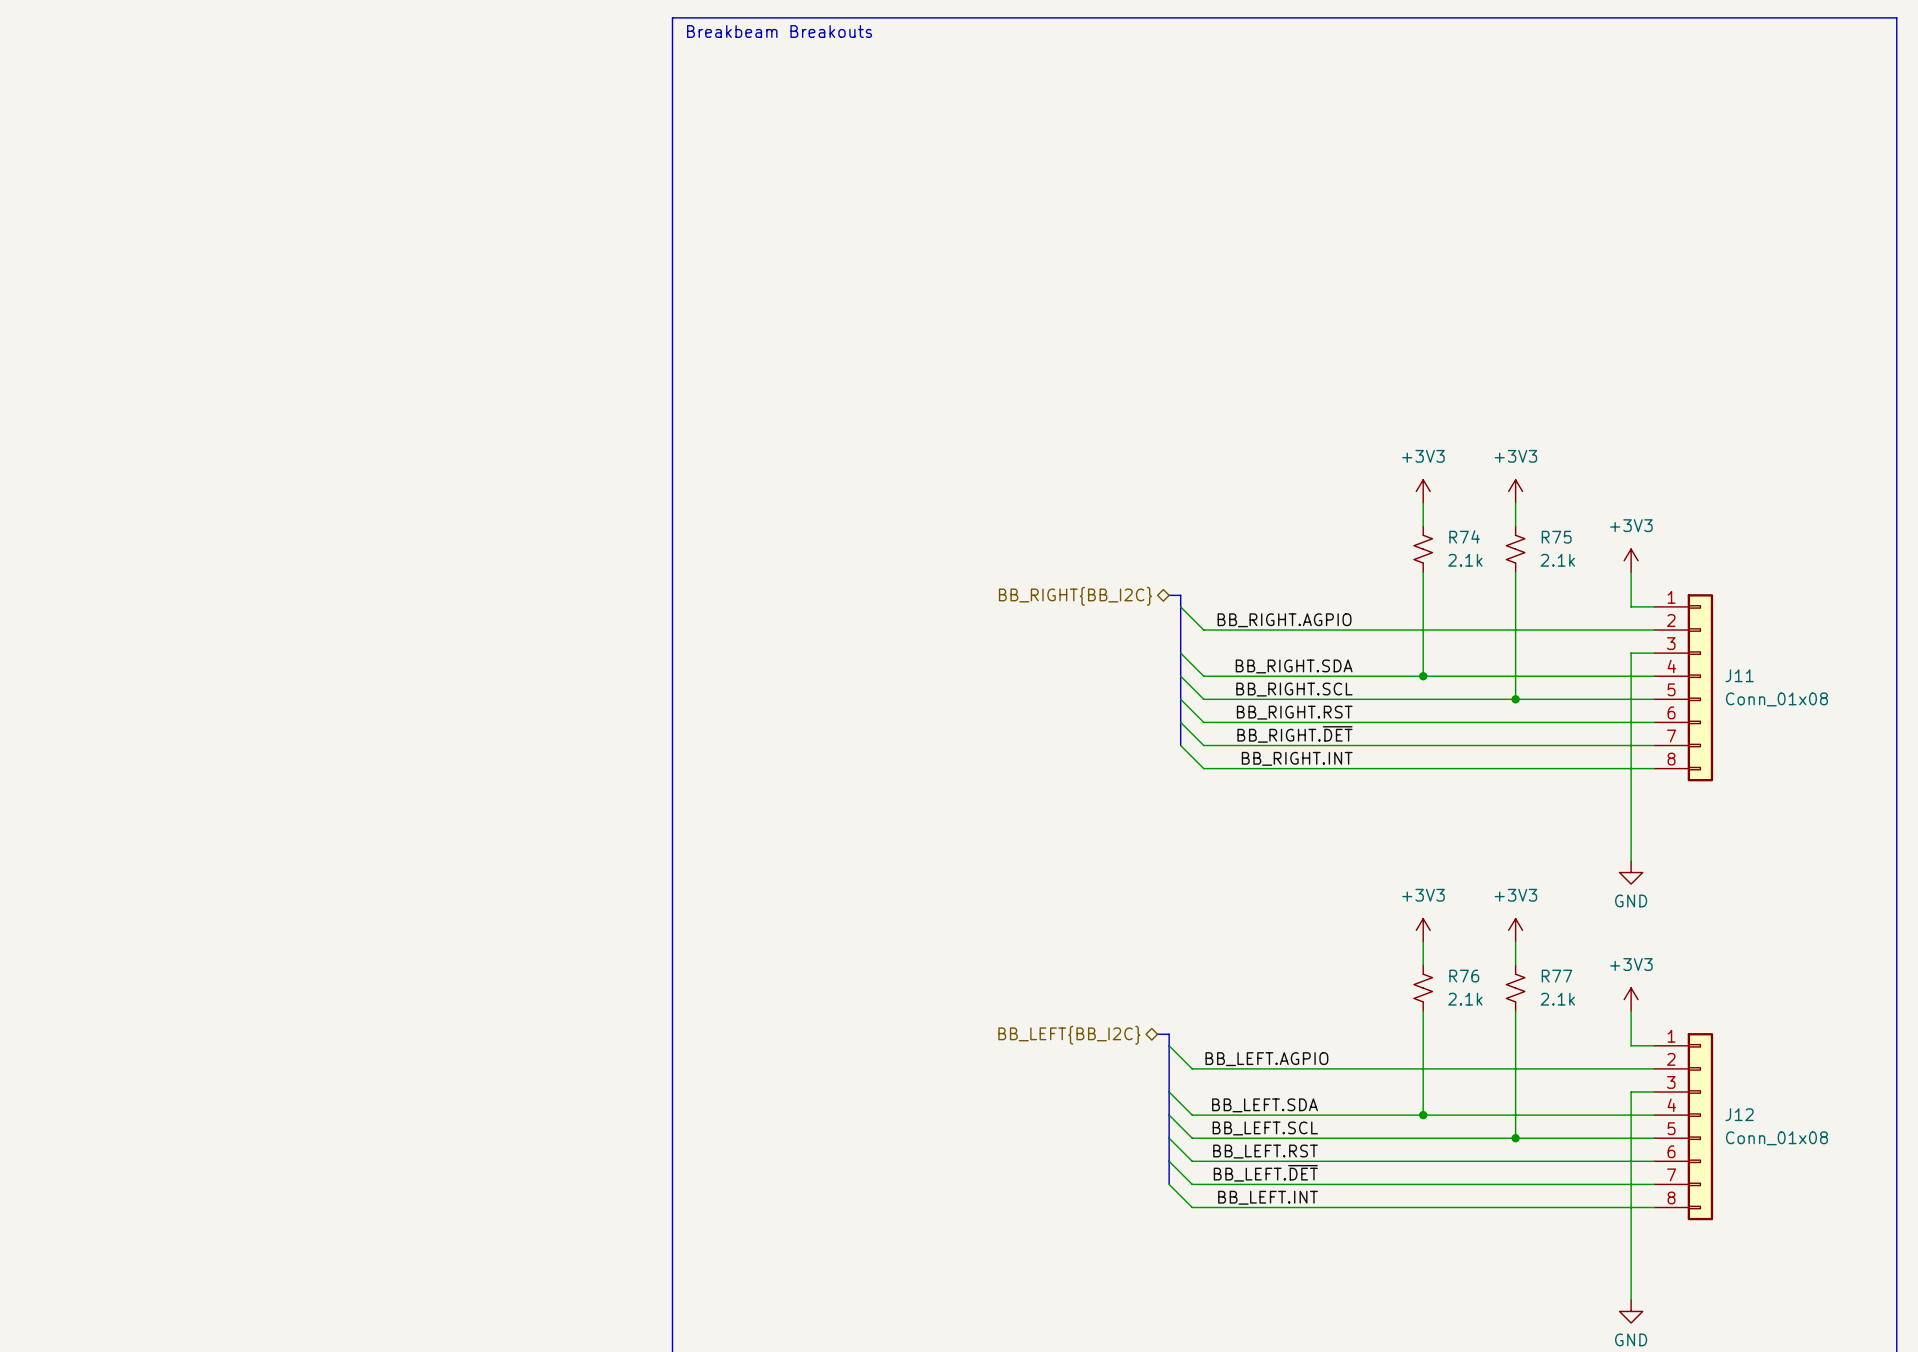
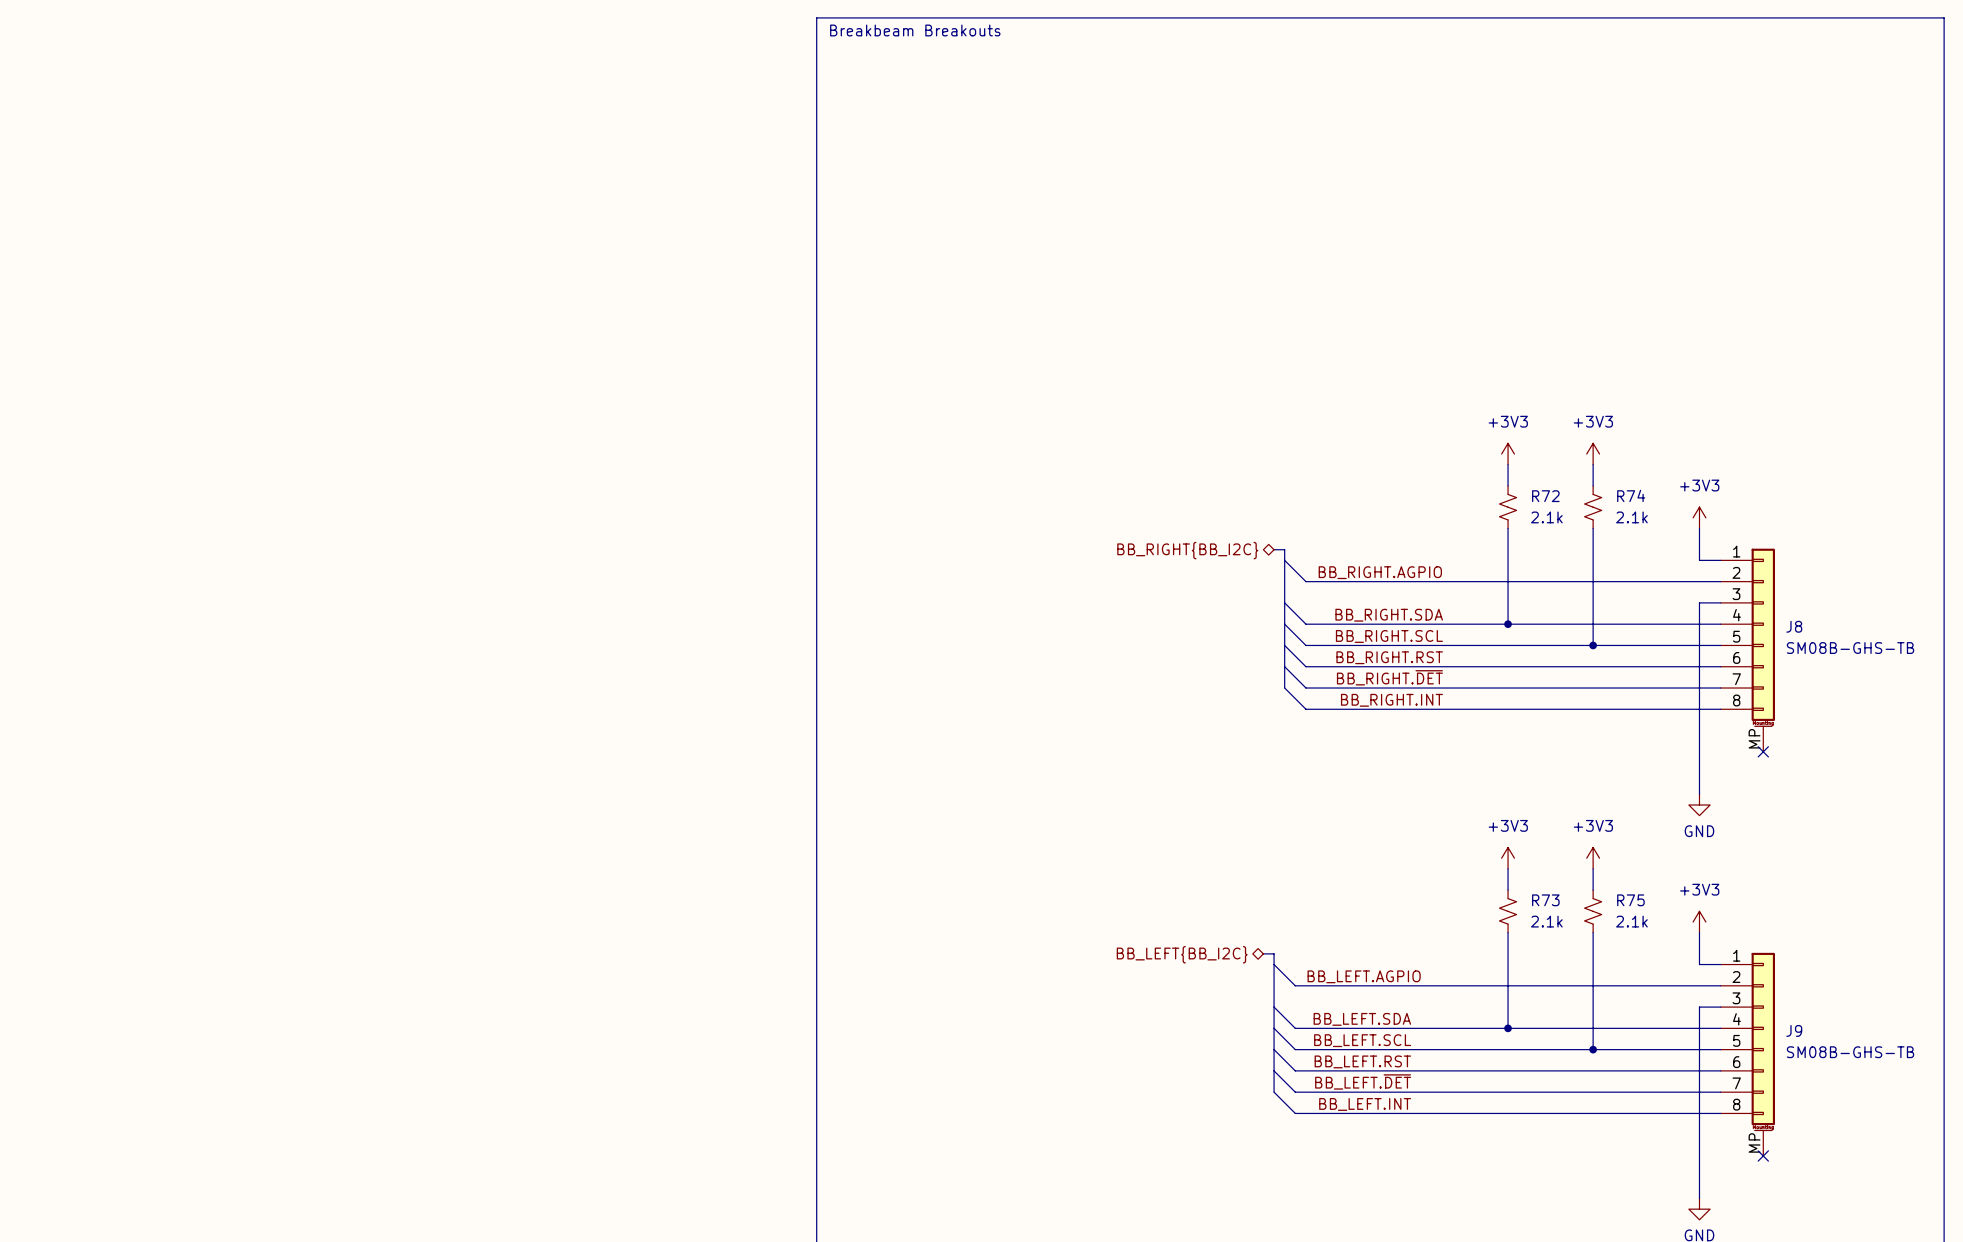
R74 name: R74 (1464, 536) -> R72 (1545, 496)
R75 name: R75 (1556, 537) -> R74 (1631, 495)
J11: Conn_01x08 (1683, 687) -> none
J8: none -> SM08B-GHS-TB (1747, 650)
no-connect mark: none -> (1763, 751)
R76 name: R76 (1464, 976) -> R73 (1545, 900)
R77 name: R77 (1556, 976) -> R75 (1630, 900)
J12: Conn_01x08 (1683, 1126) -> none
J9: none -> SM08B-GHS-TB (1747, 1054)
no-connect mark: none -> (1763, 1155)

